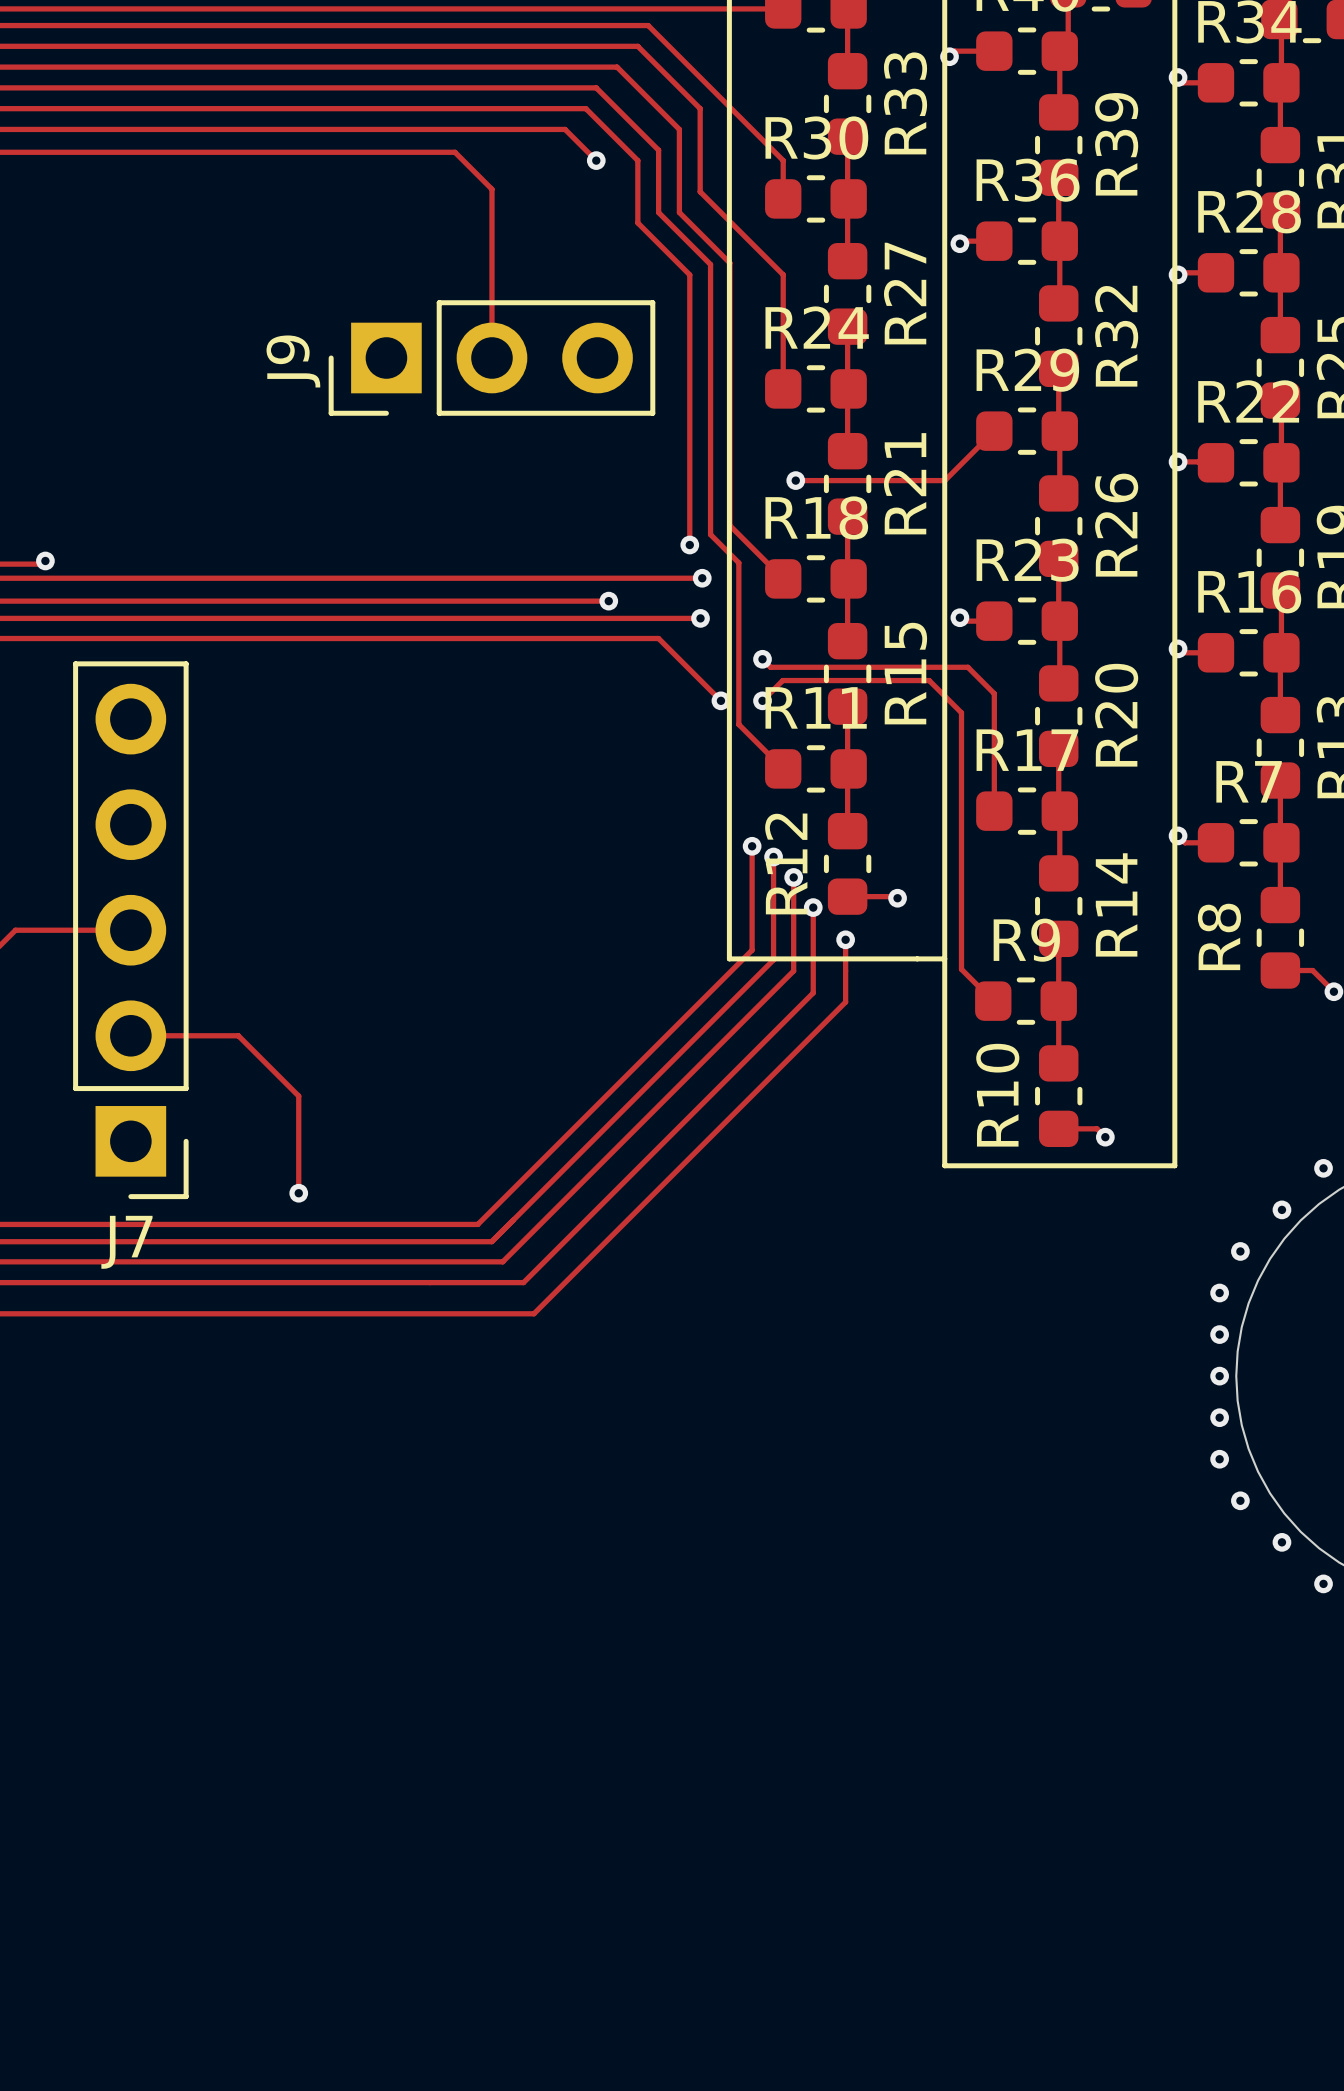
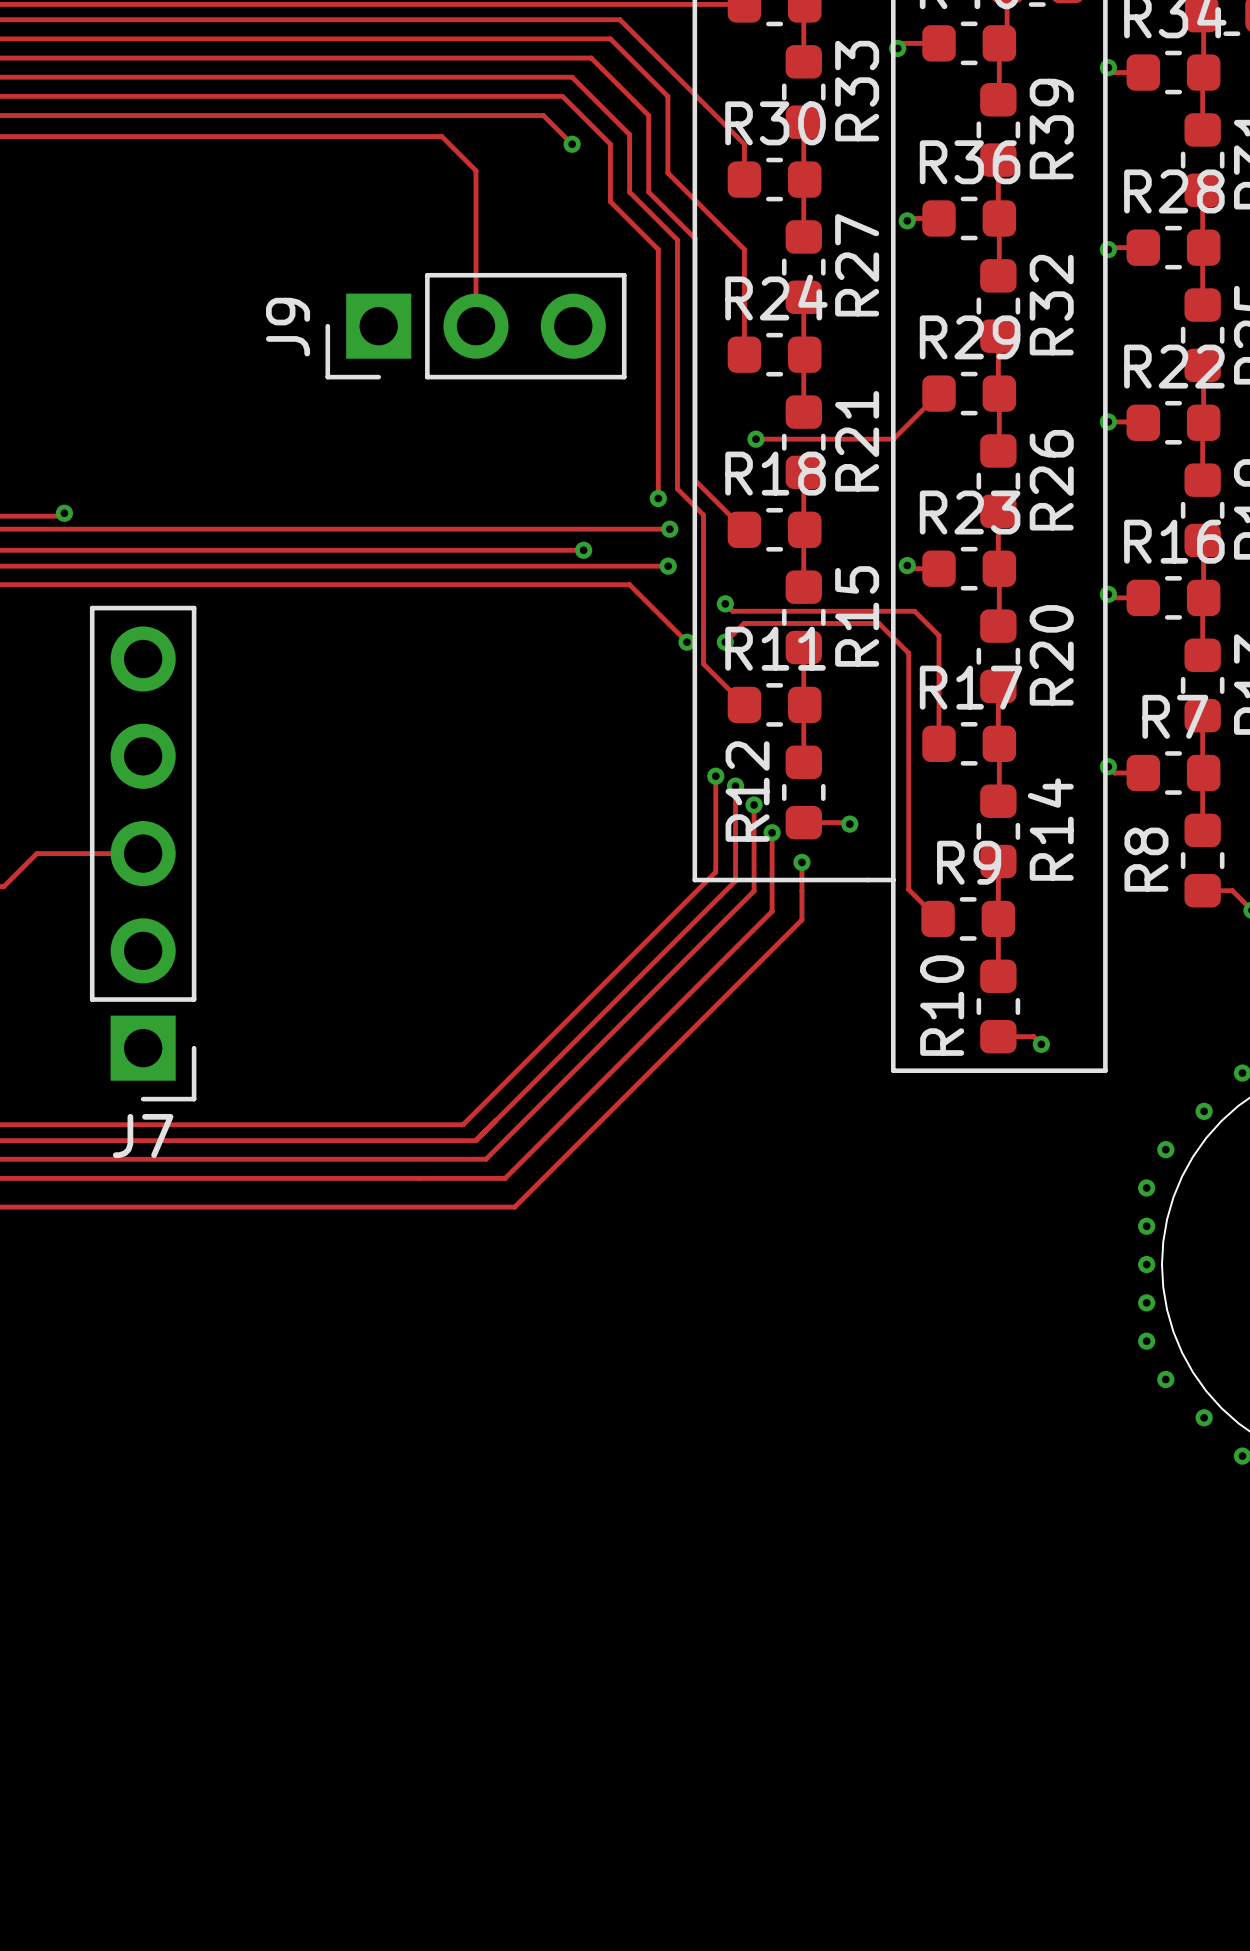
track: (130, 1035) (238, 1035) (298, 1096) (298, 1193) -> none
via: (298, 1193) -> none

